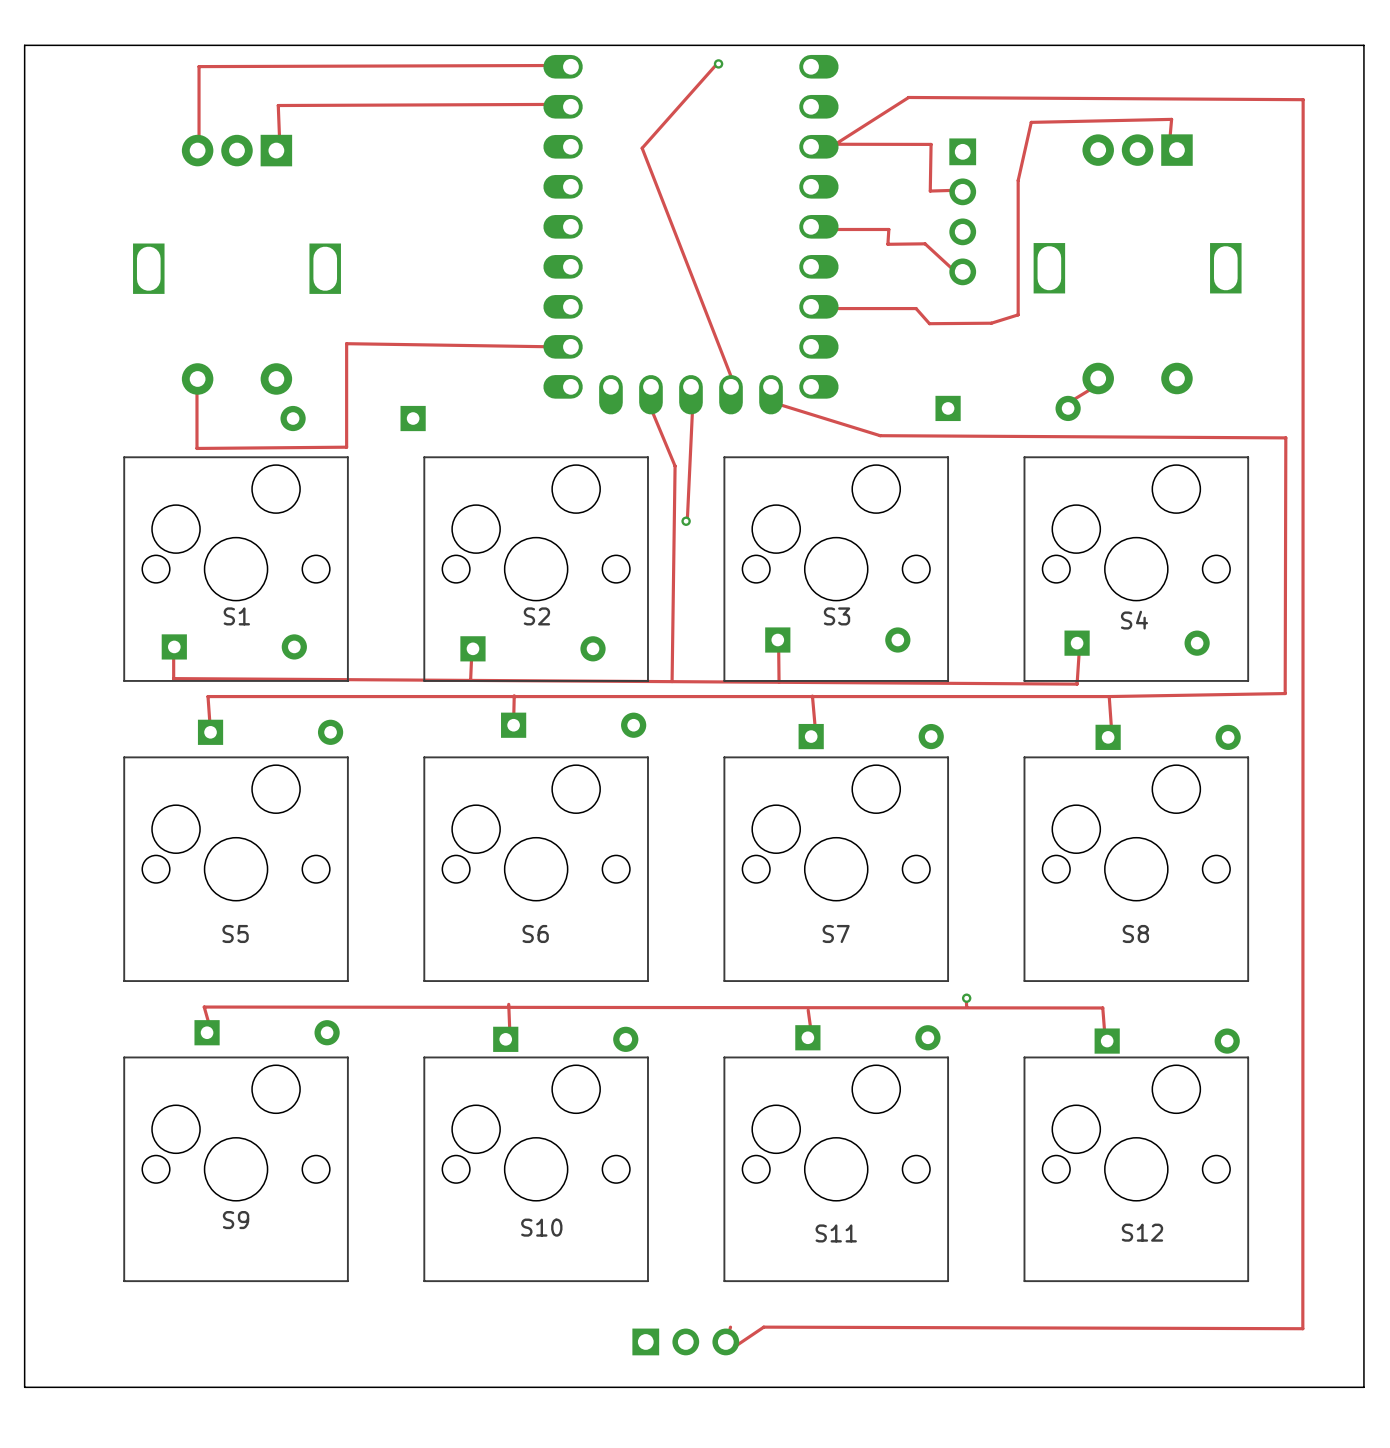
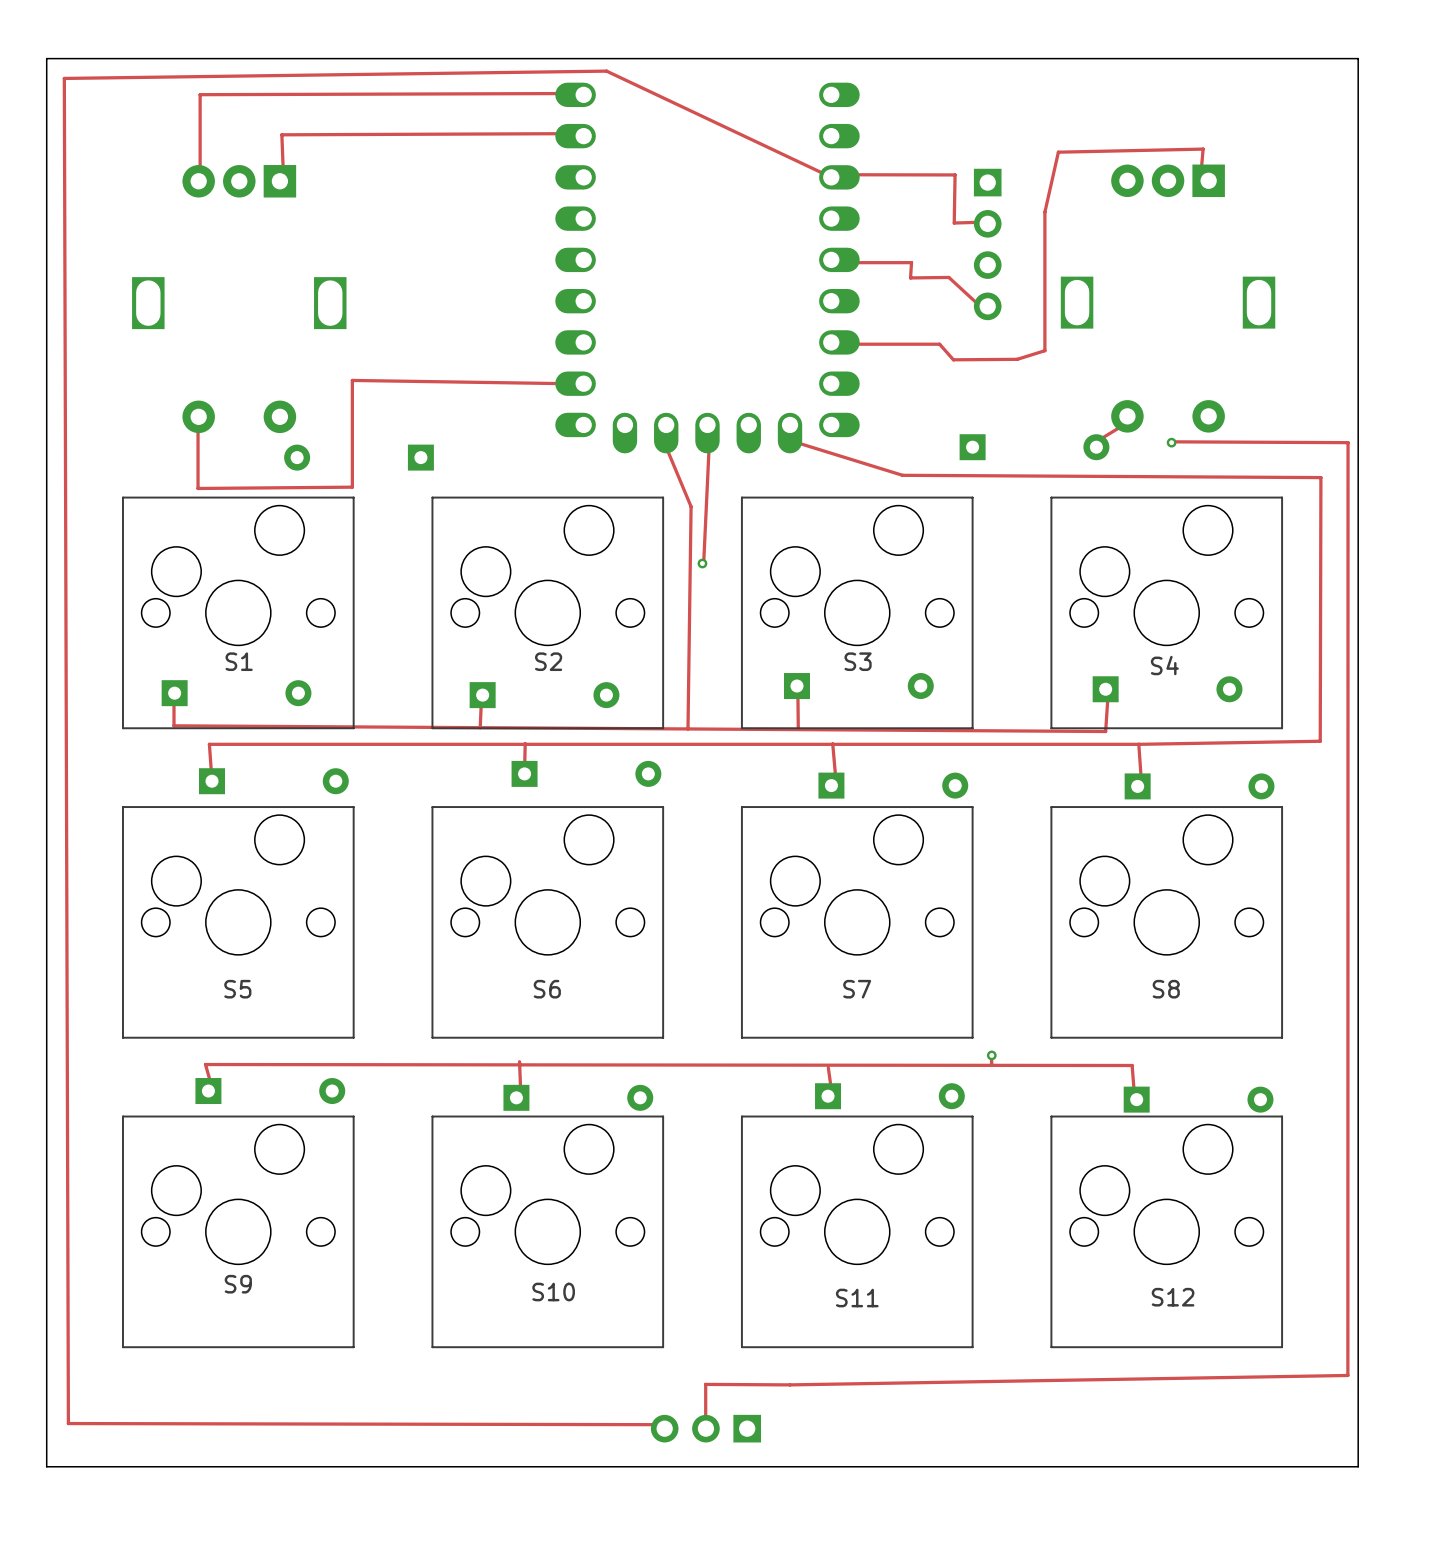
board edge: (24, 45) (1363, 45) (1363, 1387) (24, 1387) (24, 45) -> (46, 58) (46, 1466) (1358, 1466) (1358, 58) (46, 58)
track: (718, 62) (642, 148) (730, 375) -> none
via: (718, 63) -> none
track: none -> (826, 174) (606, 71) (64, 78) (68, 1423) (668, 1424)
track: (835, 144) (908, 97) (1303, 99) (1302, 1328) (763, 1327) (731, 1349) -> none
track: none -> (1174, 441) (1348, 442) (1347, 1375) (790, 1384) (705, 1384) (705, 1429)
via: none -> (1171, 442)
track: (730, 1327) (729, 1331) -> none
part rotation: 0° (685, 1341) -> 180° (705, 1428)

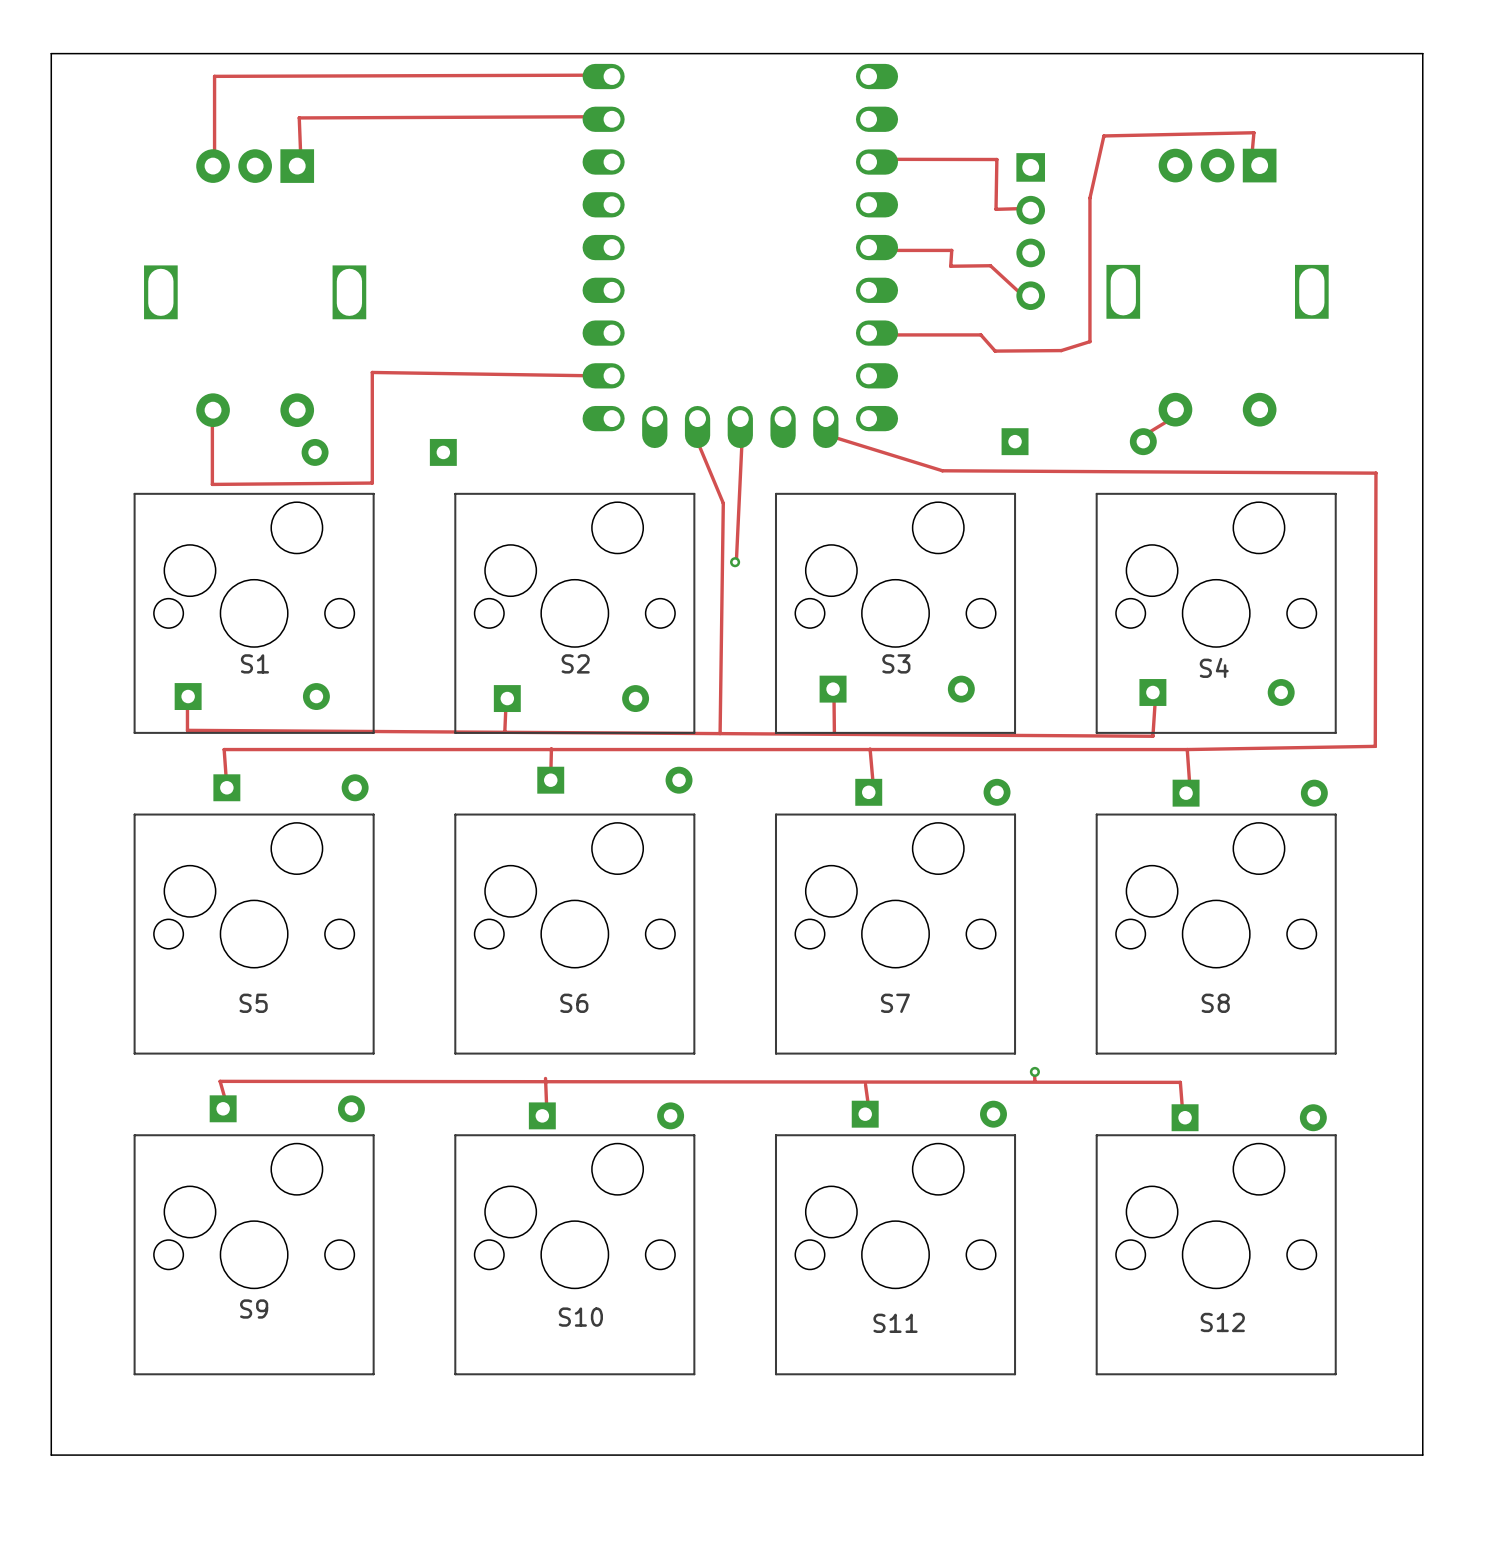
board edge: (46, 58) (1358, 58) (1358, 1466) (46, 1466) (46, 58) -> (51, 53) (51, 1455) (1422, 1455) (1422, 53) (51, 53)
track: (826, 174) (606, 71) (64, 78) (68, 1423) (668, 1424) -> none
track: (1174, 441) (1348, 442) (1347, 1375) (790, 1384) (705, 1384) (705, 1429) -> none
via: (1171, 442) -> none
part: (705, 1428) -> none

